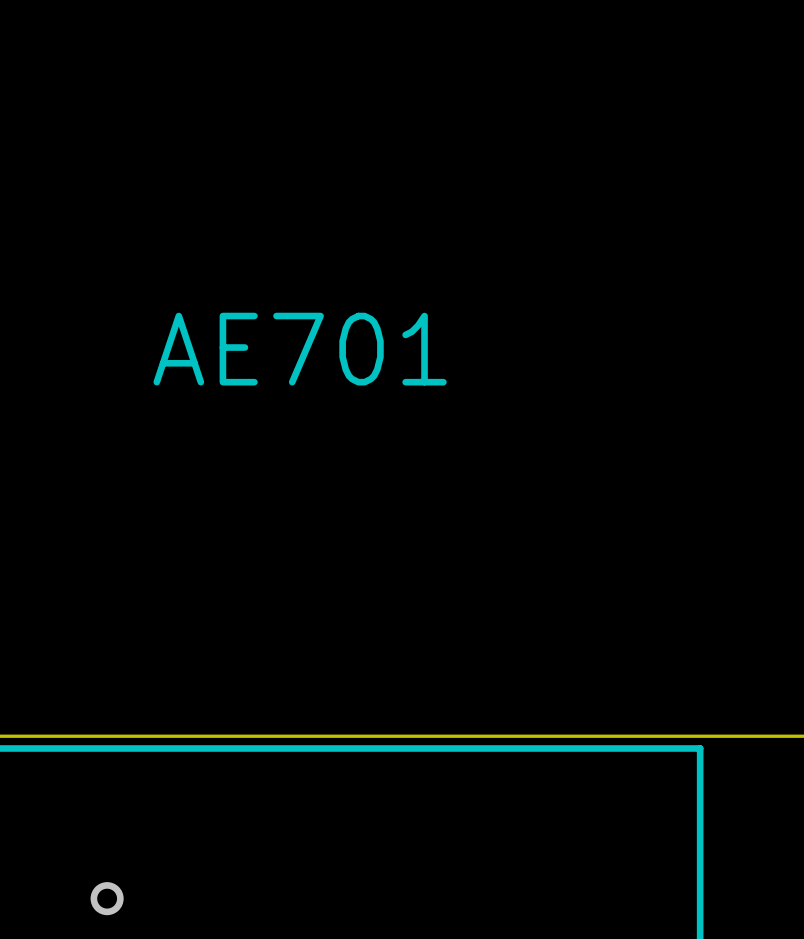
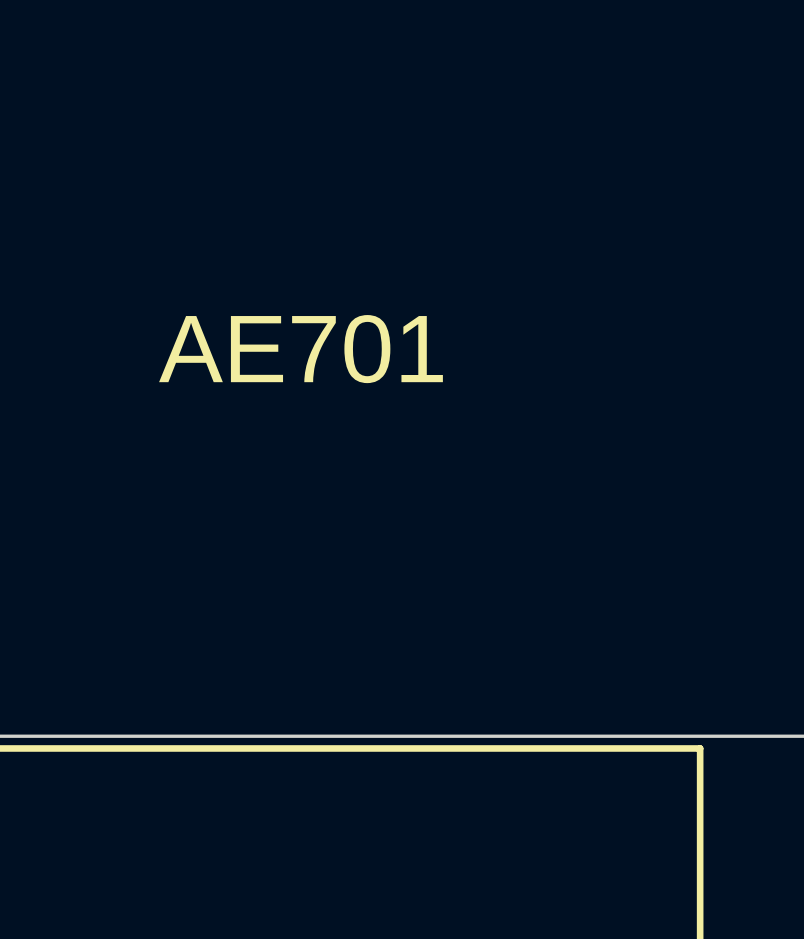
via: (107, 898) -> none

